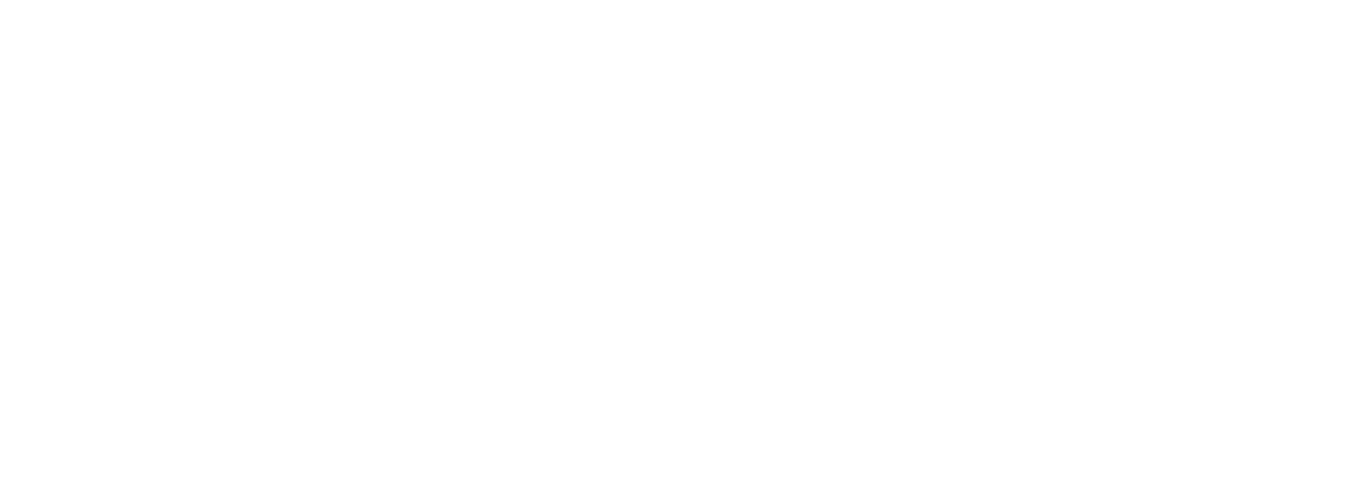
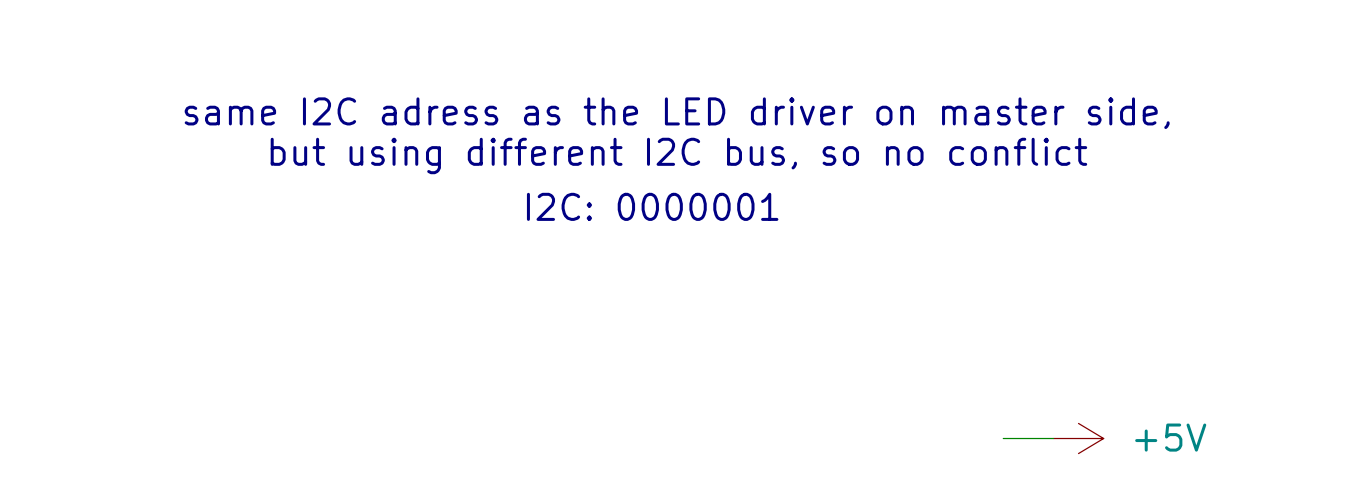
text: none -> same I2C adress as the LED driver on master side, (677, 113)
text: none -> but using different I2C bus, so no conflict (678, 155)
text: none -> I2C: 0000001 (652, 206)
wire: none -> (1003, 438) (1053, 438)
power symbol: none -> +5V (1078, 438)

